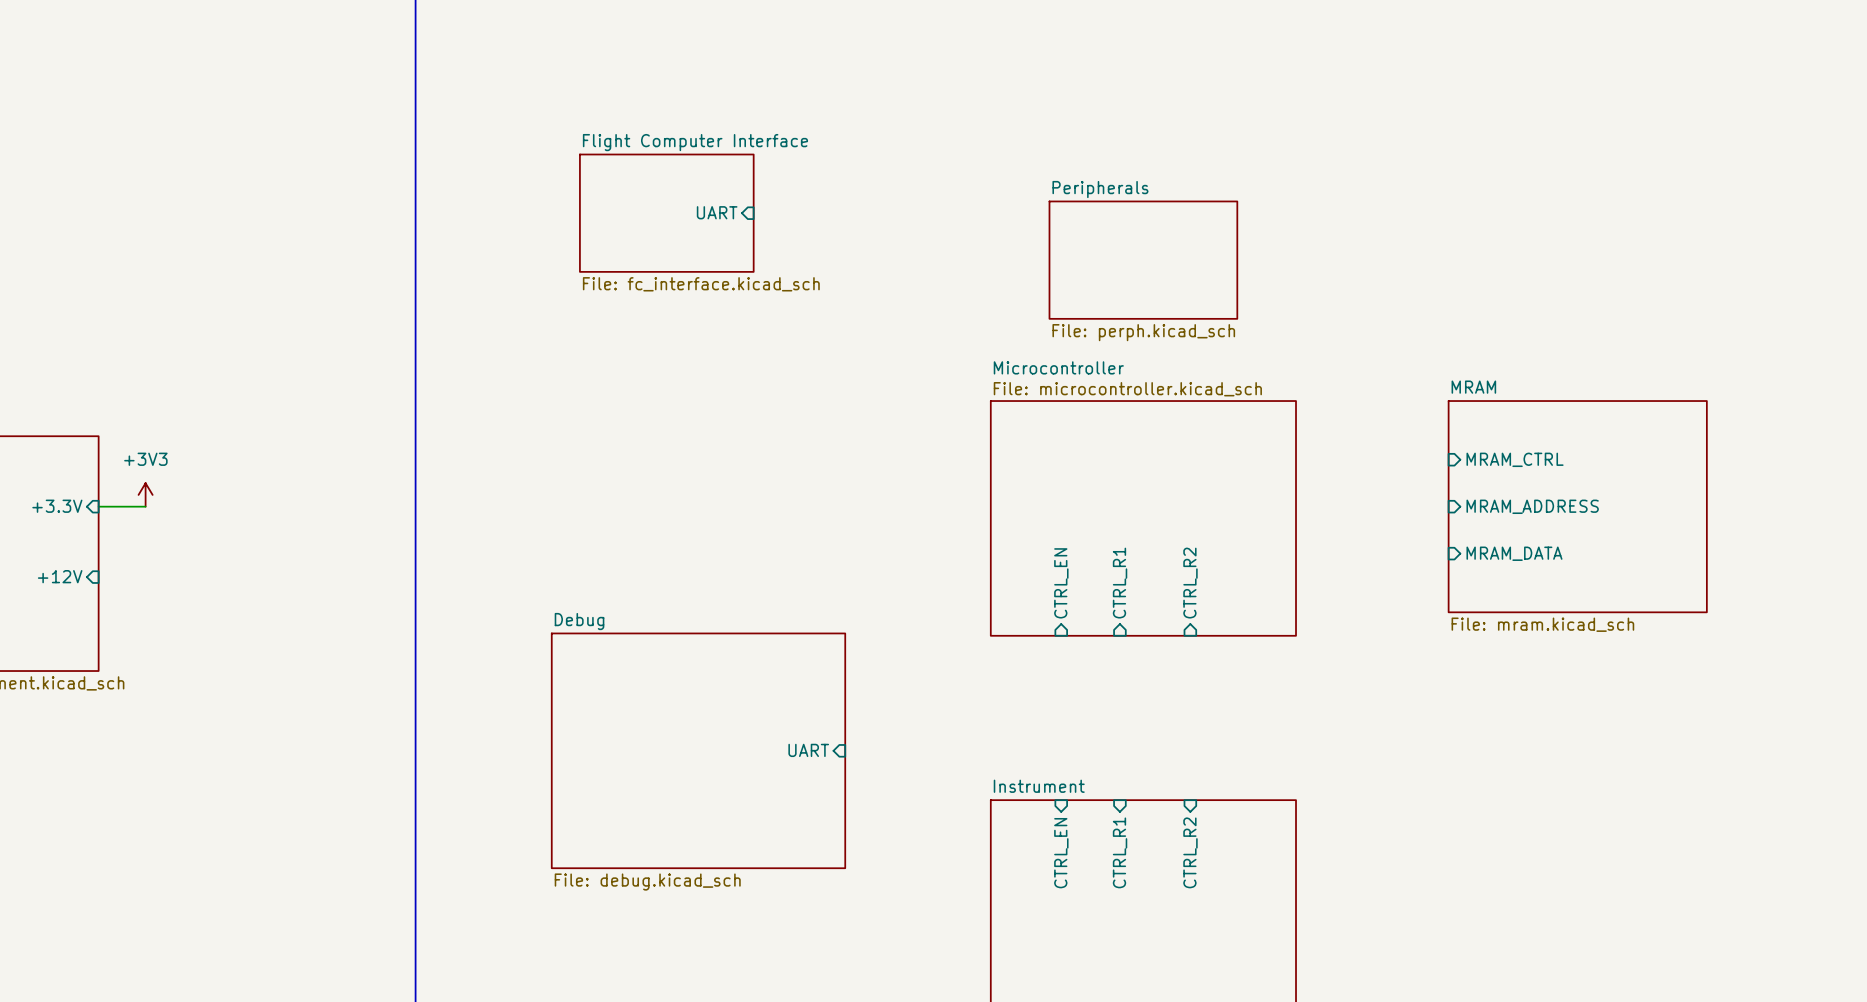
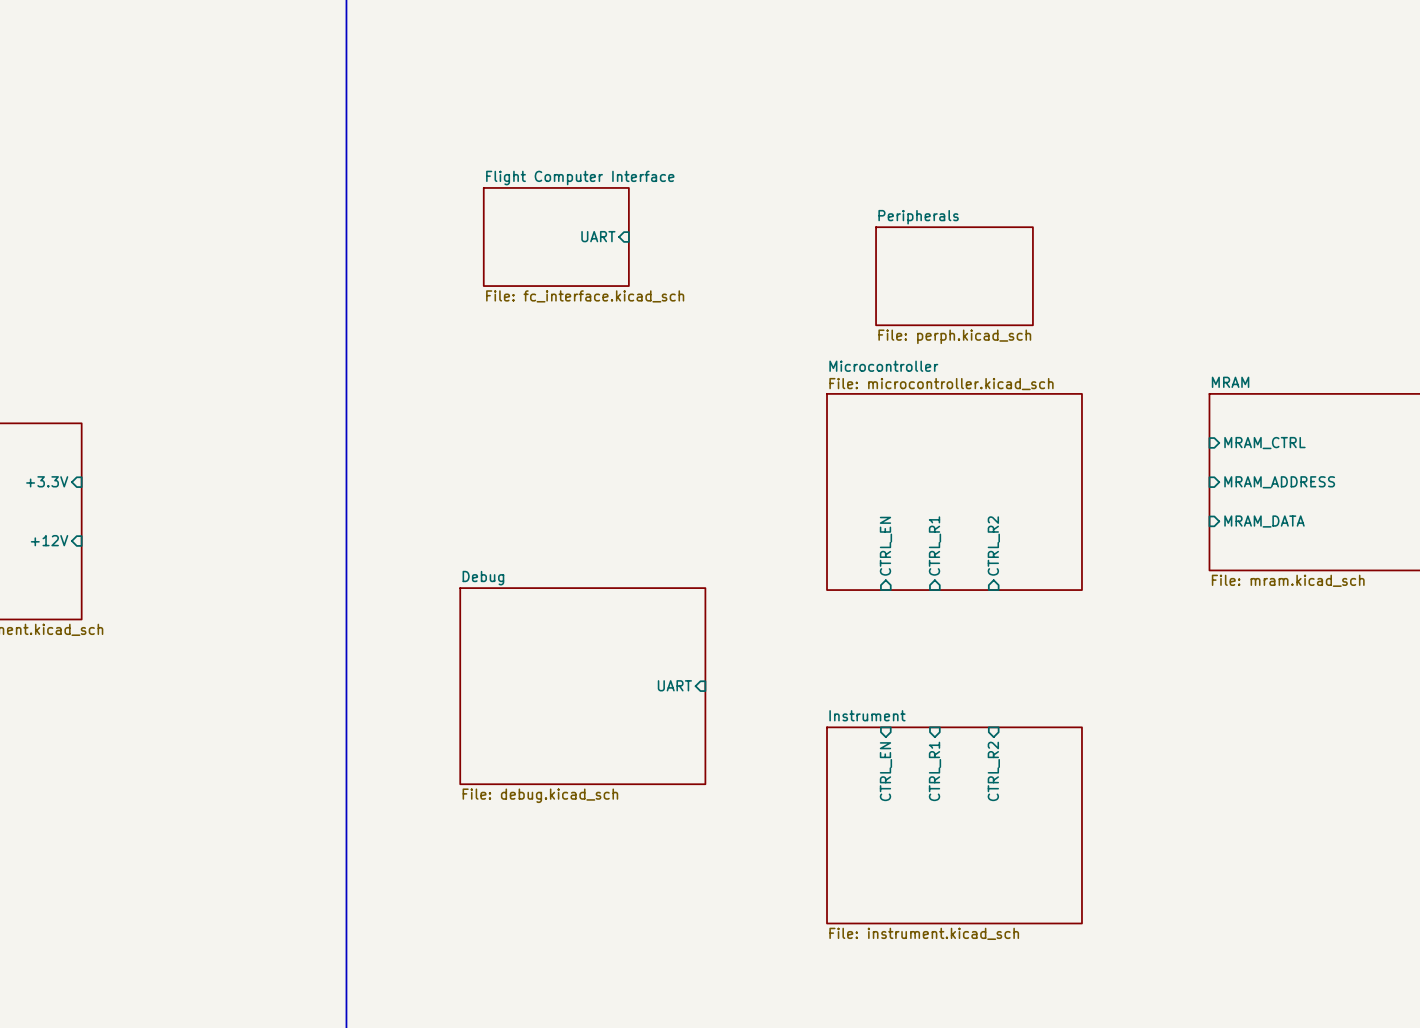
power symbol: +3V3 (145, 494) -> none
wire: (98, 506) (145, 506) -> none

